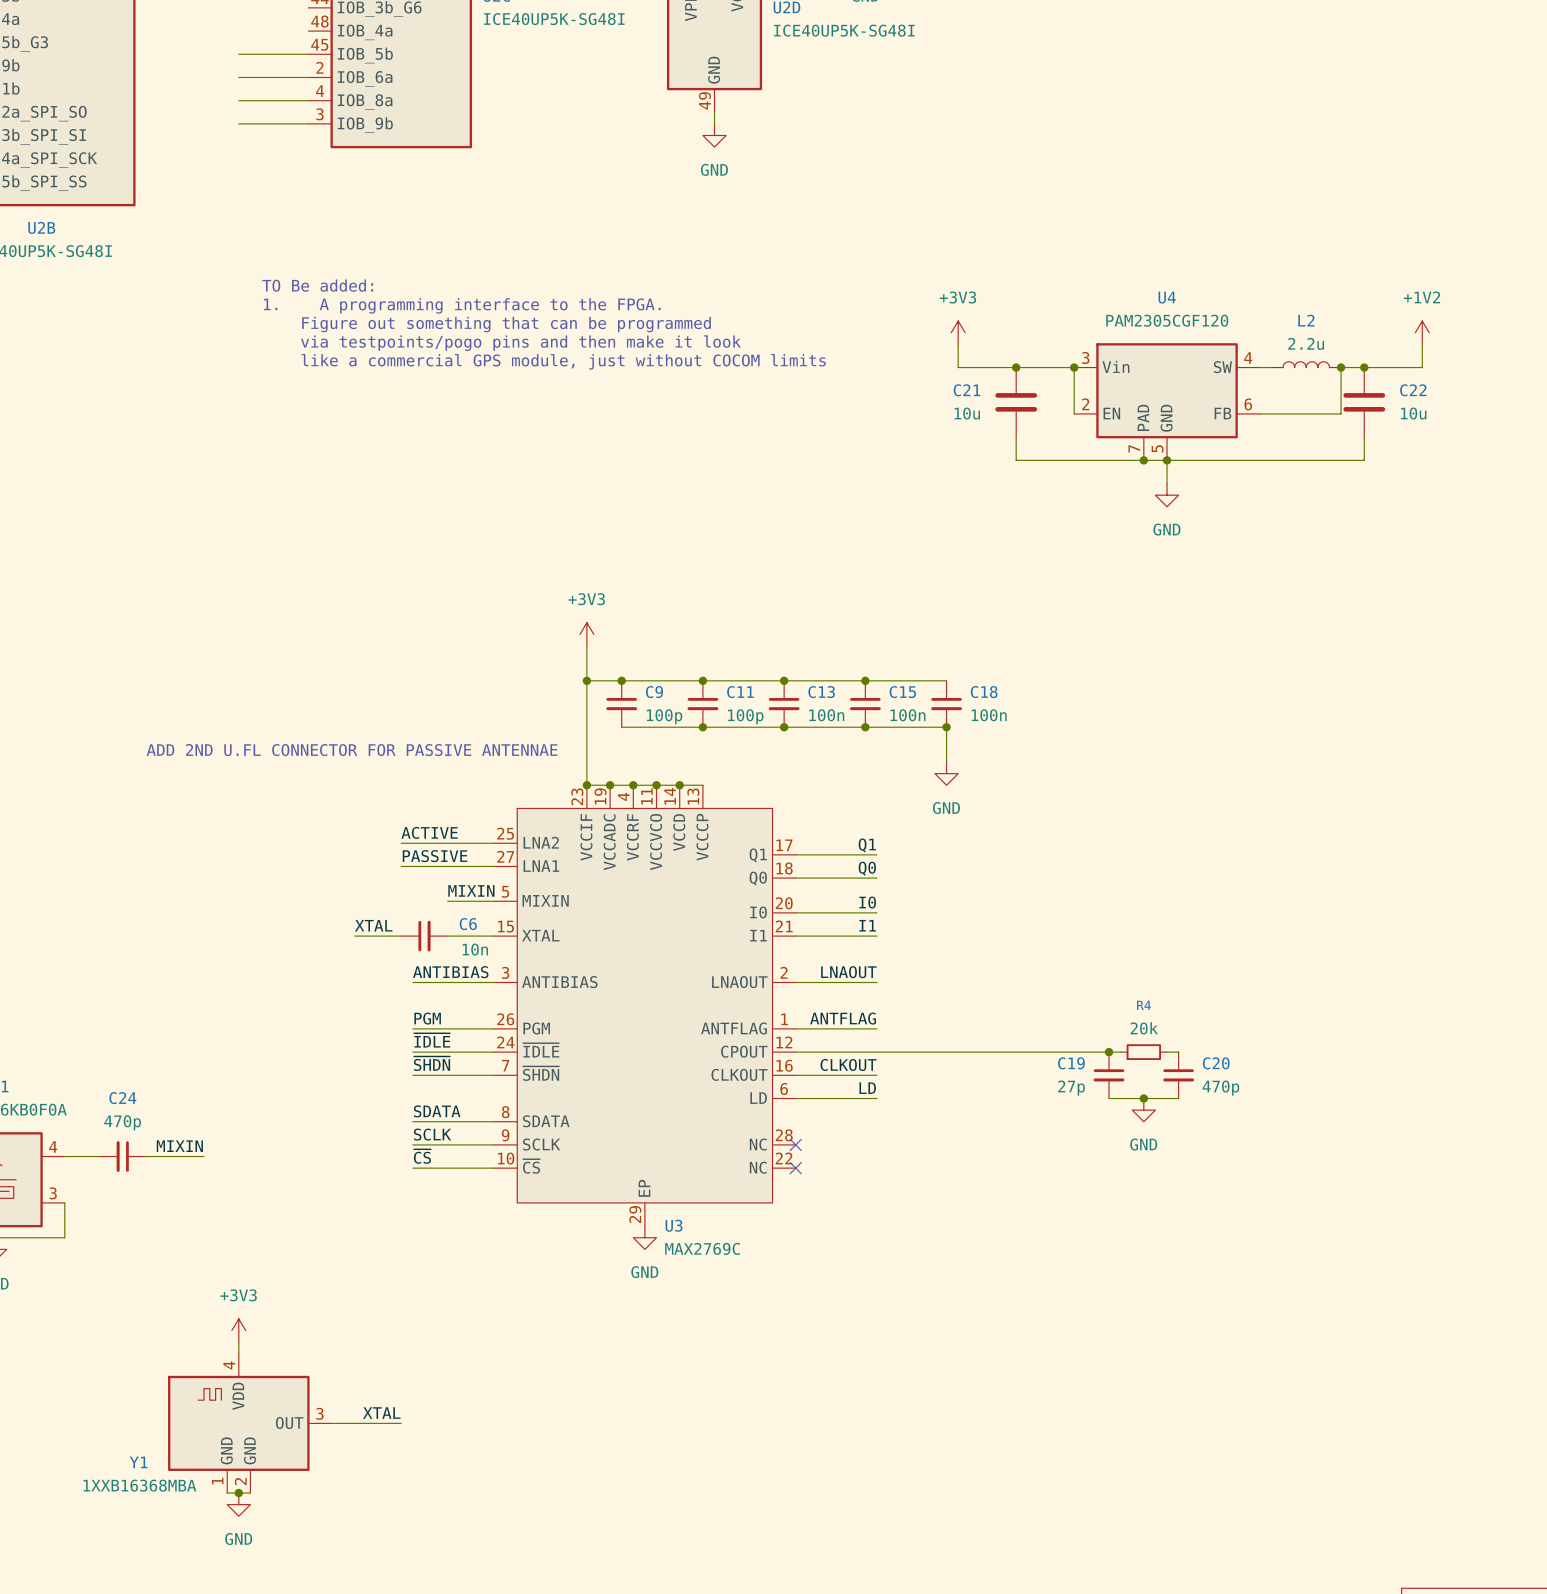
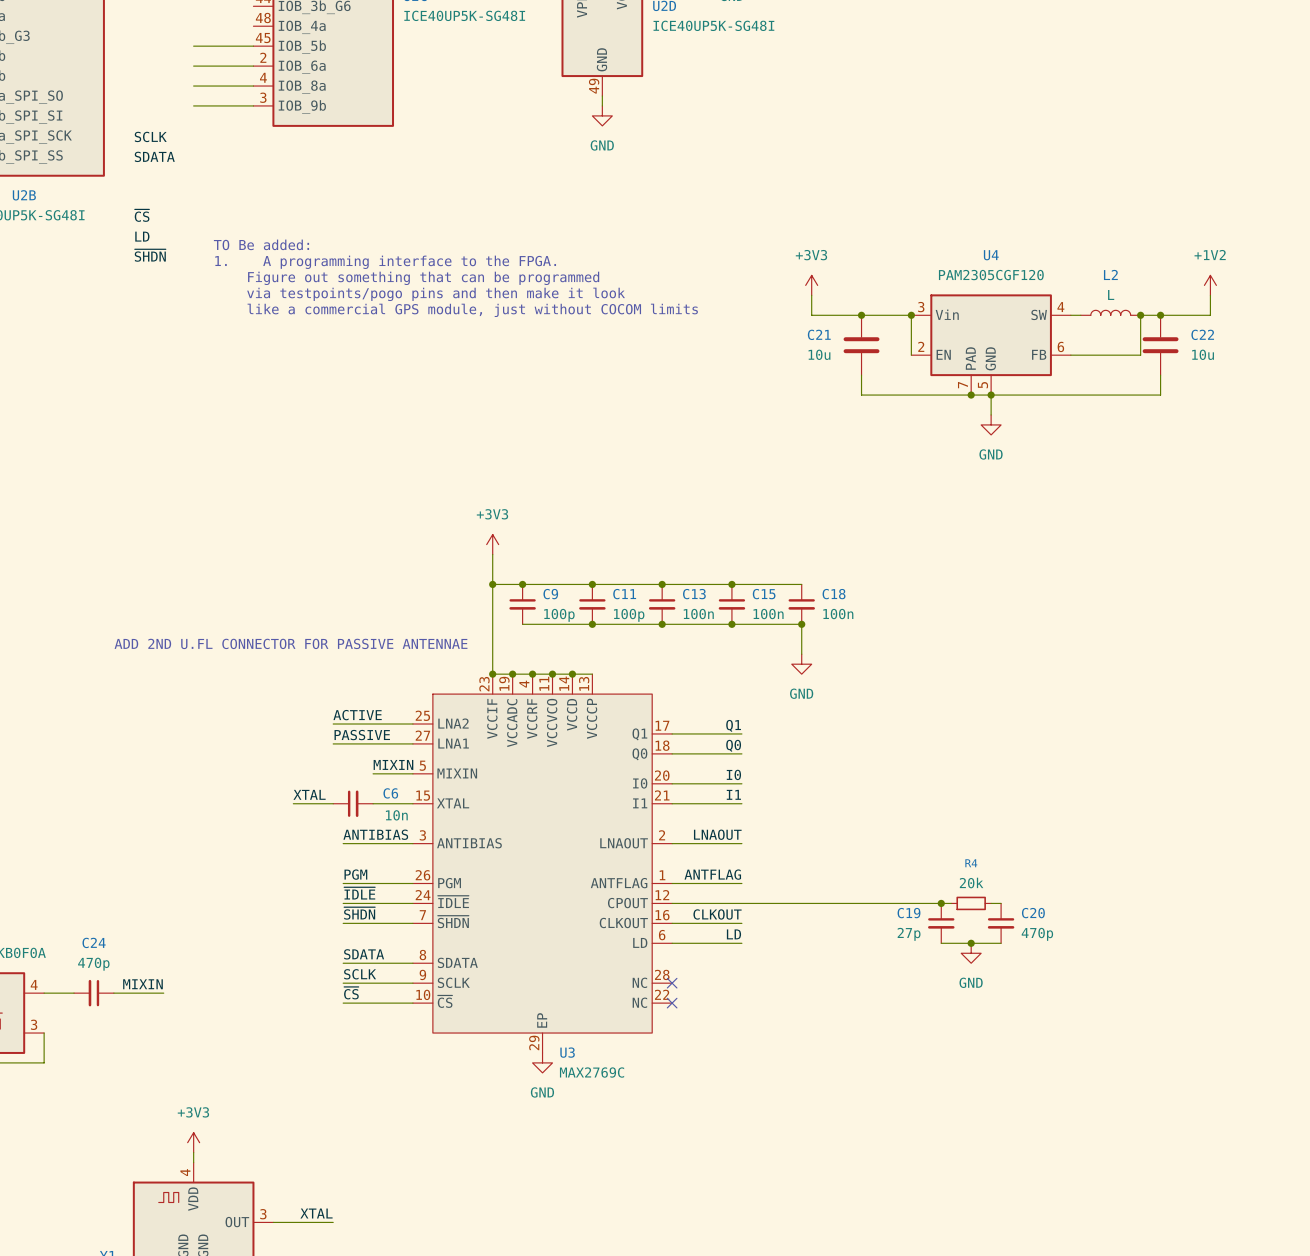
label: none -> SCLK (150, 136)
label: none -> SDATA (154, 156)
label: none -> ~{CS} (142, 215)
label: none -> LD (142, 236)
label: none -> ~{SHDN} (150, 255)
L2 value: 2.2u (1306, 343) -> L (1111, 294)

